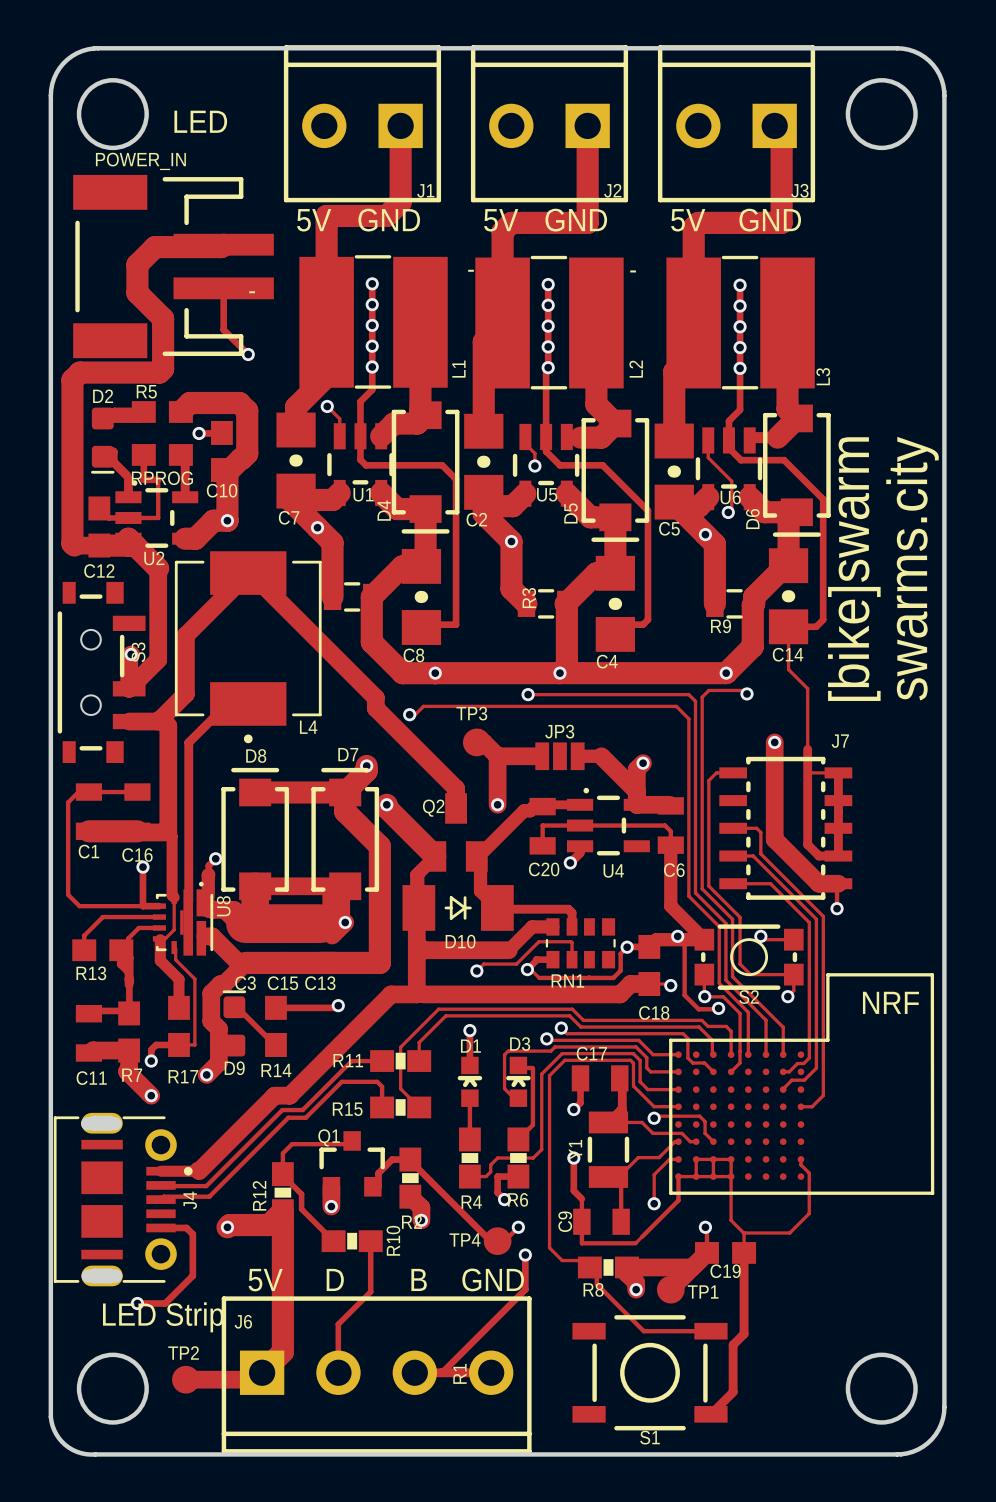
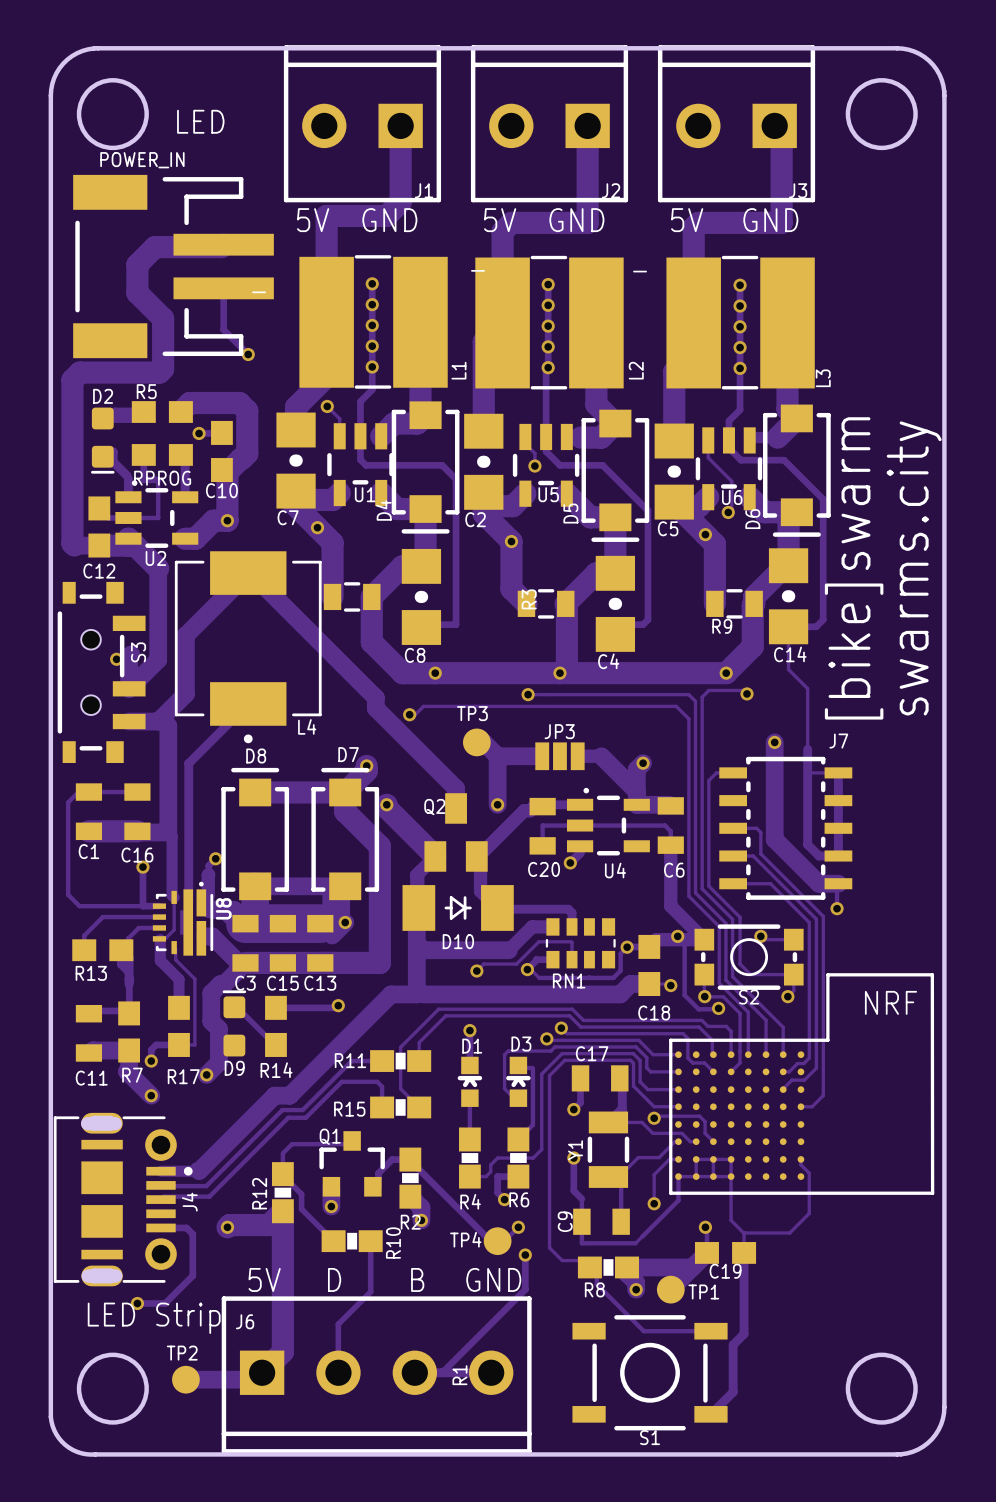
via position: (131, 654) -> (116, 659)
track: (248, 703) (227, 703) (188, 742) (188, 763) -> (248, 703) (188, 763)

